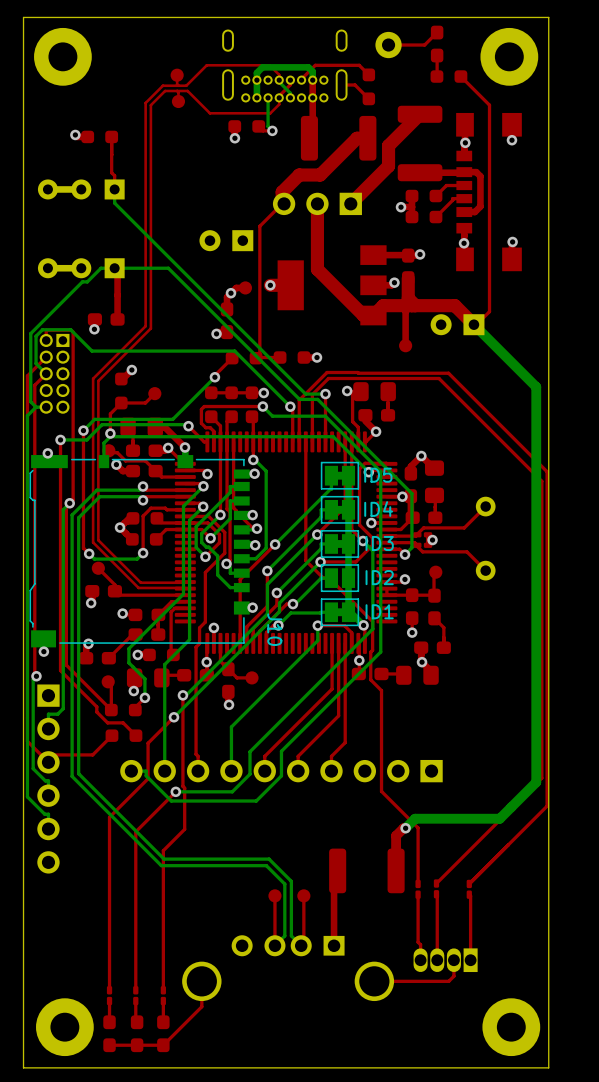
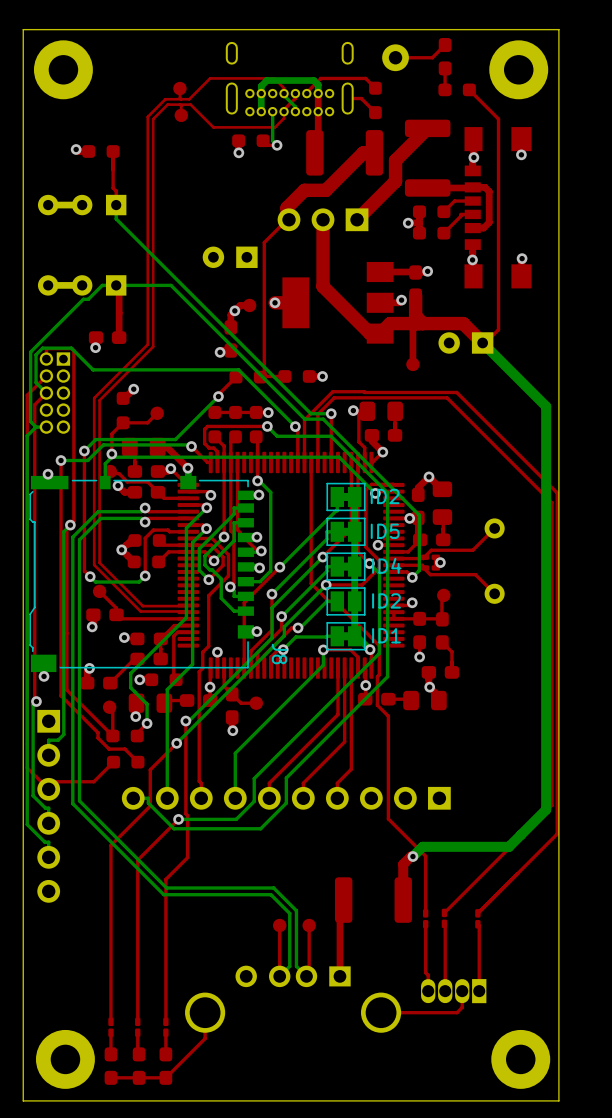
ID5 name: ID5 (378, 475) -> ID2 (385, 496)
ID4 name: ID4 (378, 509) -> ID5 (385, 531)
ID3 name: ID3 (379, 543) -> ID4 (386, 565)
J10 name: J10 (274, 629) -> J8 (279, 654)

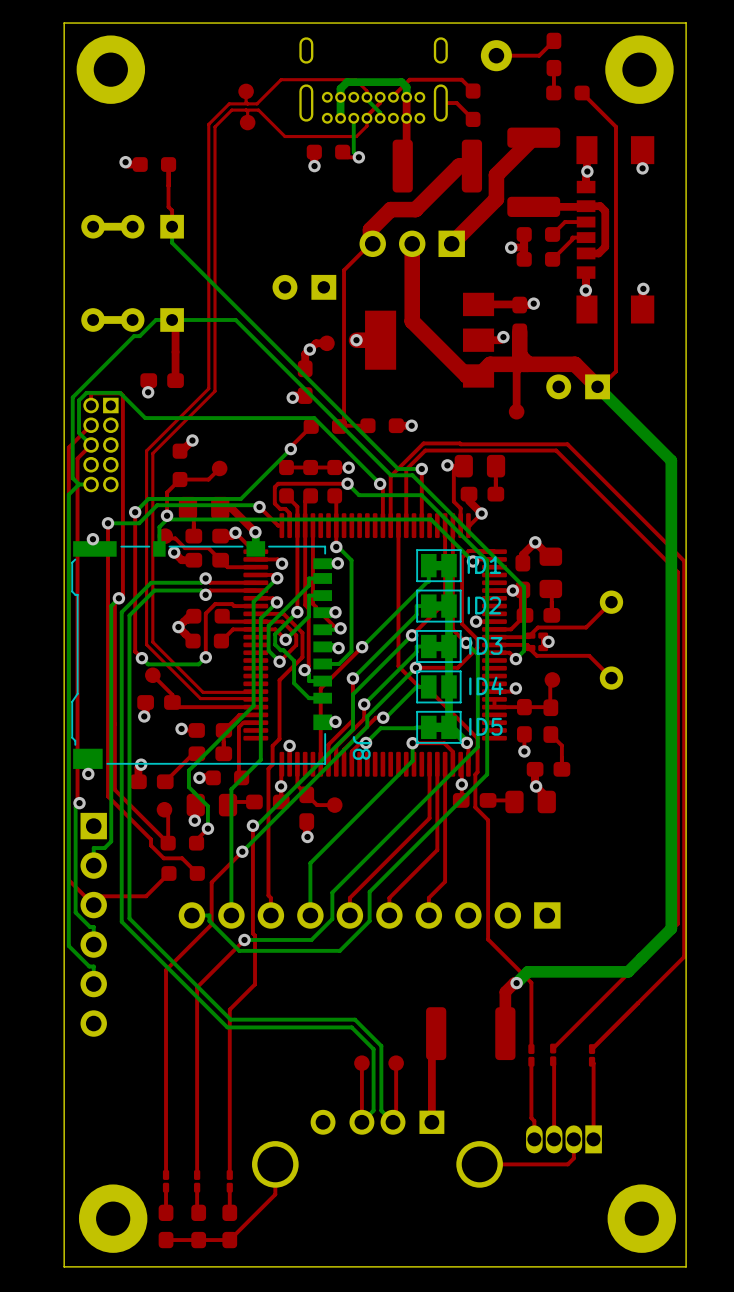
ID2 name: ID2 (385, 496) -> ID1 (484, 565)
ID5 name: ID5 (385, 531) -> ID2 (484, 605)
ID4 name: ID4 (386, 565) -> ID3 (485, 645)
ID2 name: ID2 (386, 600) -> ID4 (486, 685)
ID1 name: ID1 (386, 635) -> ID5 (485, 726)

